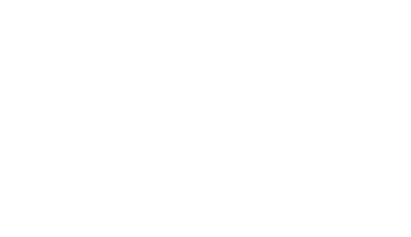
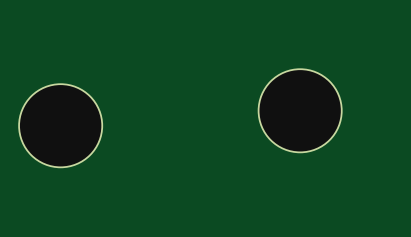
part: none -> (300, 110)
part: none -> (60, 125)

